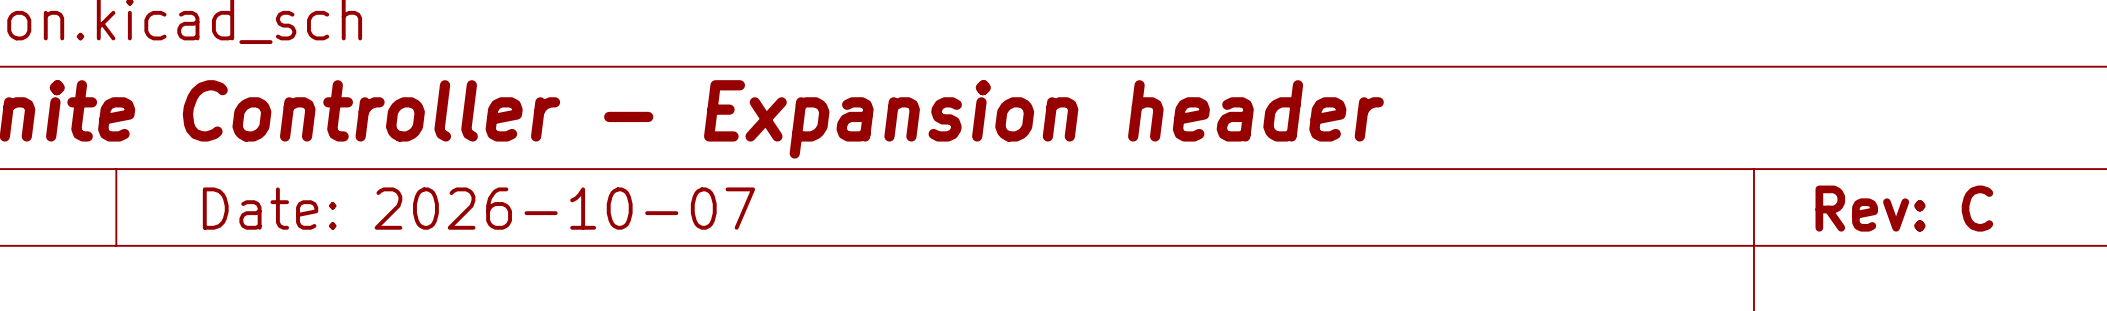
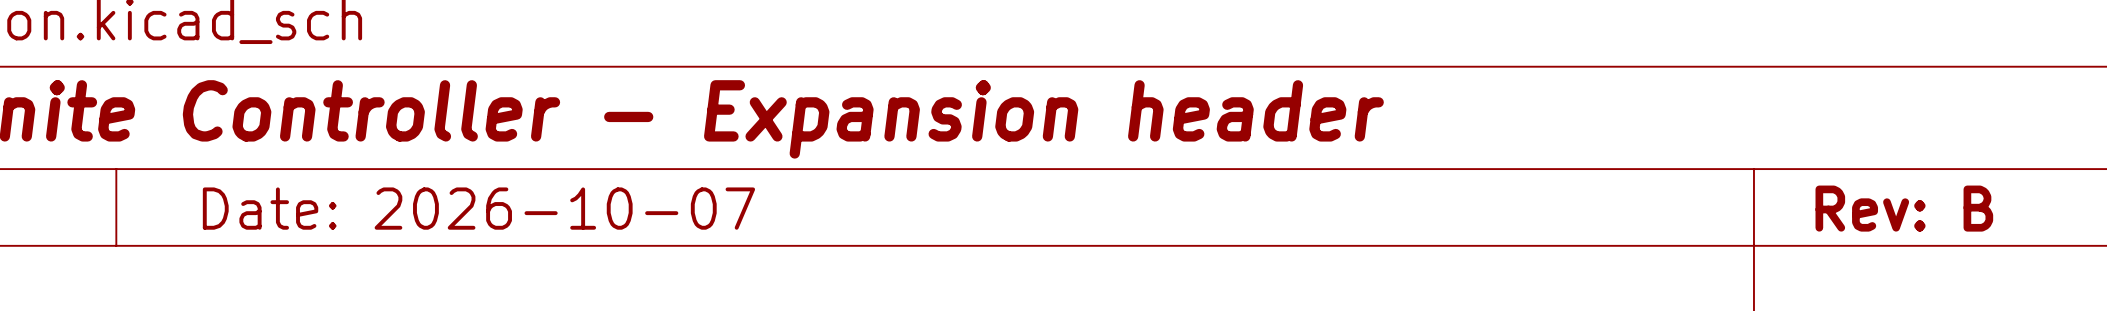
title block: Rev: C (1904, 208) -> Rev: B (1904, 208)

